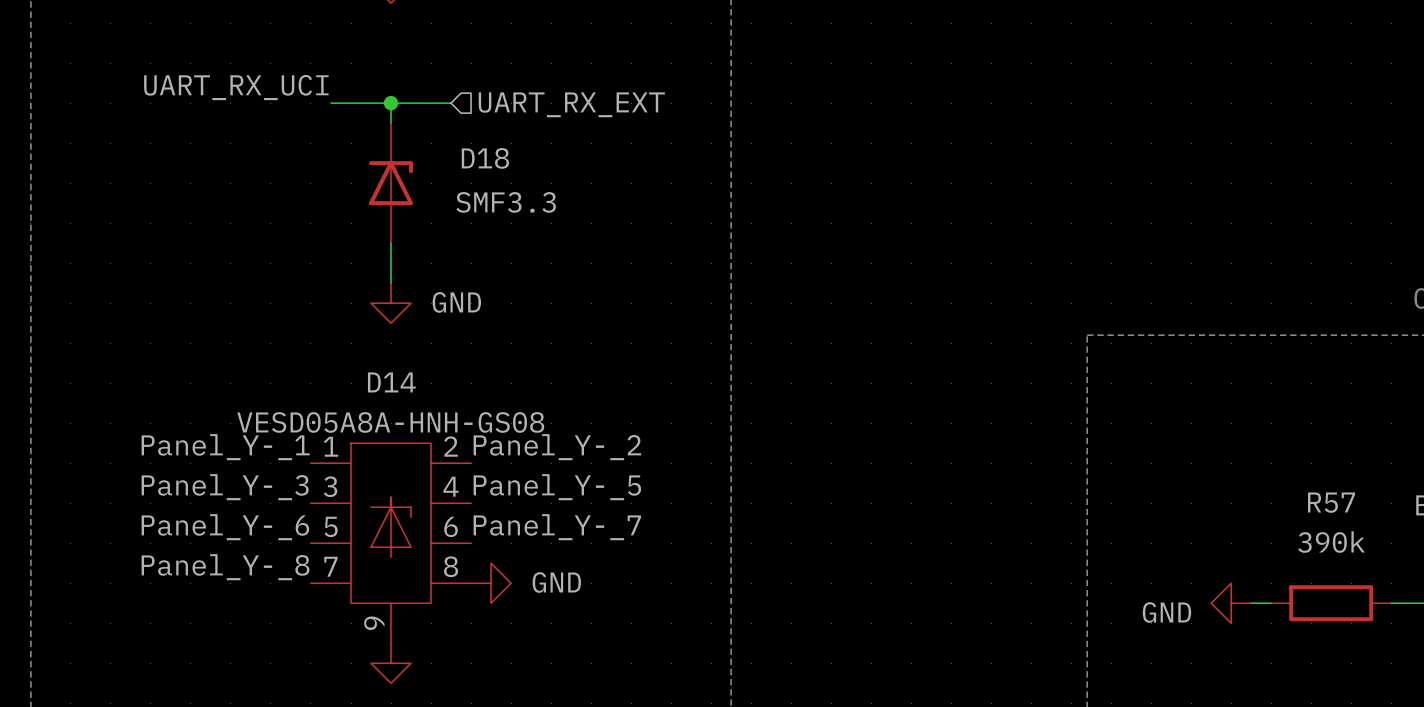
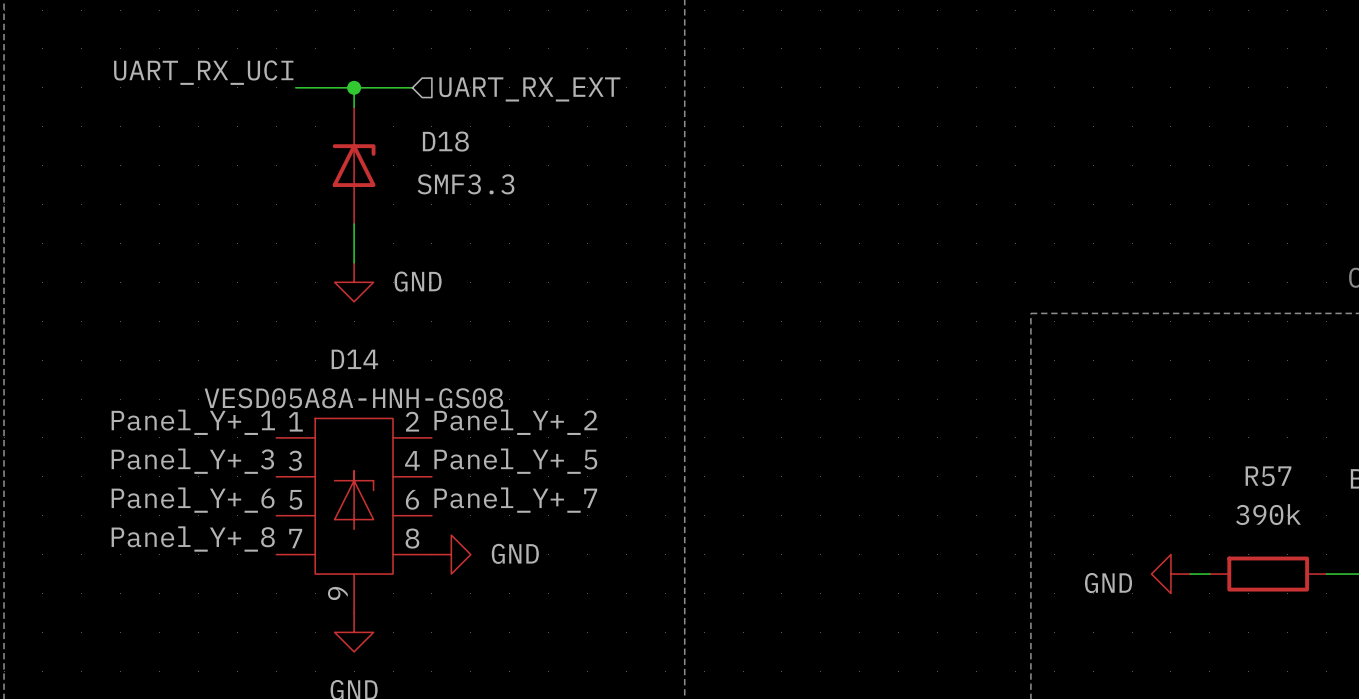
label: Panel_Y-_1 (225, 447) -> Panel_Y+_1 (193, 422)
label: Panel_Y-_2 (557, 447) -> Panel_Y+_2 (515, 422)
label: Panel_Y-_3 (225, 487) -> Panel_Y+_3 (192, 461)
label: Panel_Y-_5 (557, 487) -> Panel_Y+_5 (515, 461)
label: Panel_Y-_6 (225, 527) -> Panel_Y+_6 (193, 500)
label: Panel_Y-_7 (557, 527) -> Panel_Y+_7 (515, 500)
label: Panel_Y-_8 (225, 567) -> Panel_Y+_8 (193, 539)

